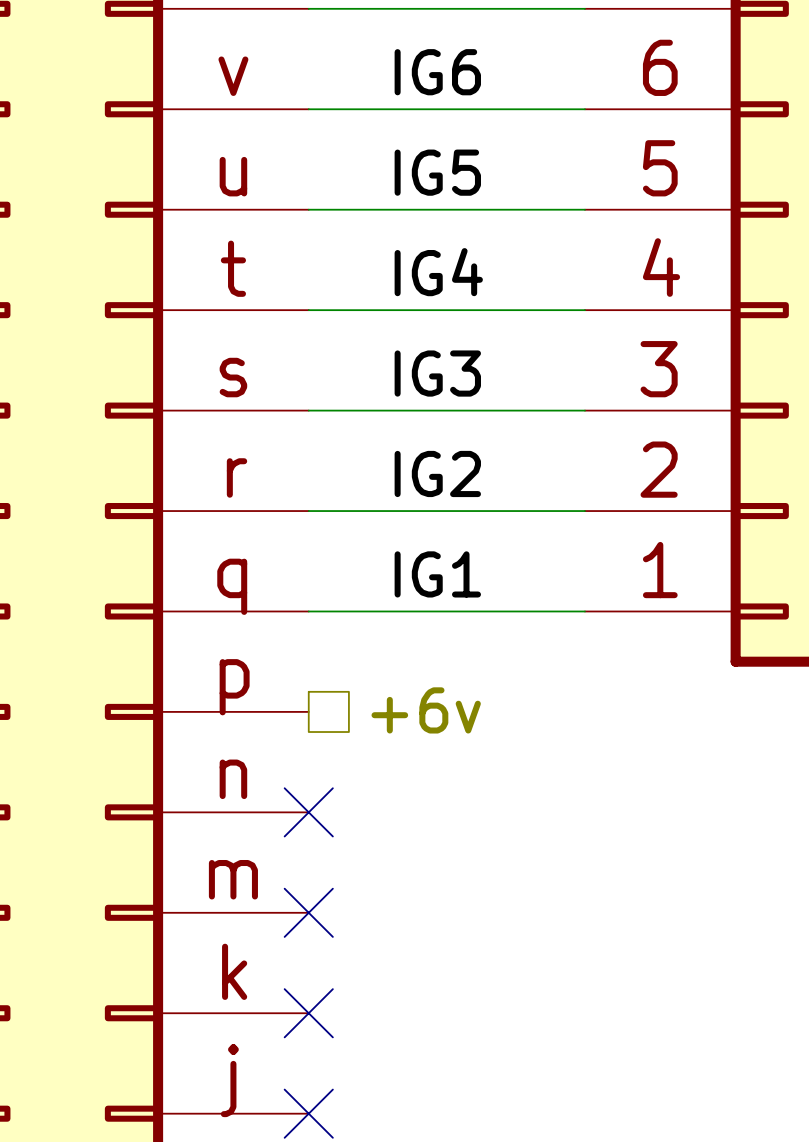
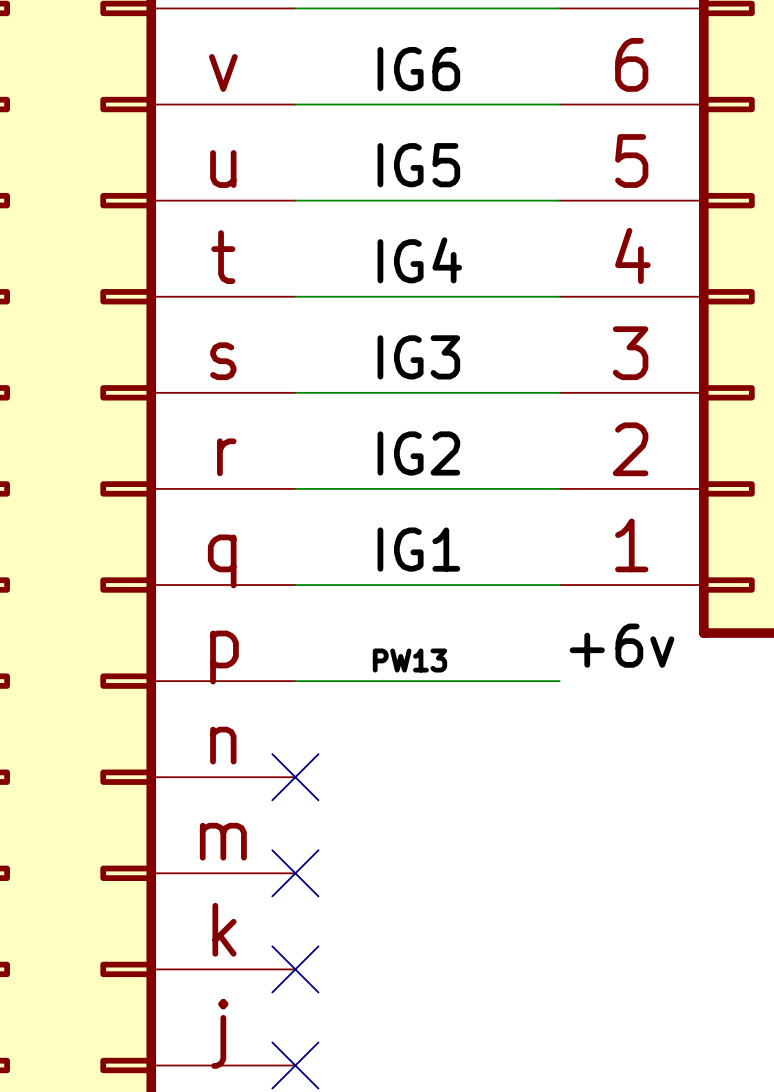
label: none -> +6v (622, 645)
label: none -> PW13 (409, 660)
hierarchical label: +6v (426, 710) -> none
wire: none -> (295, 681) (559, 681)

